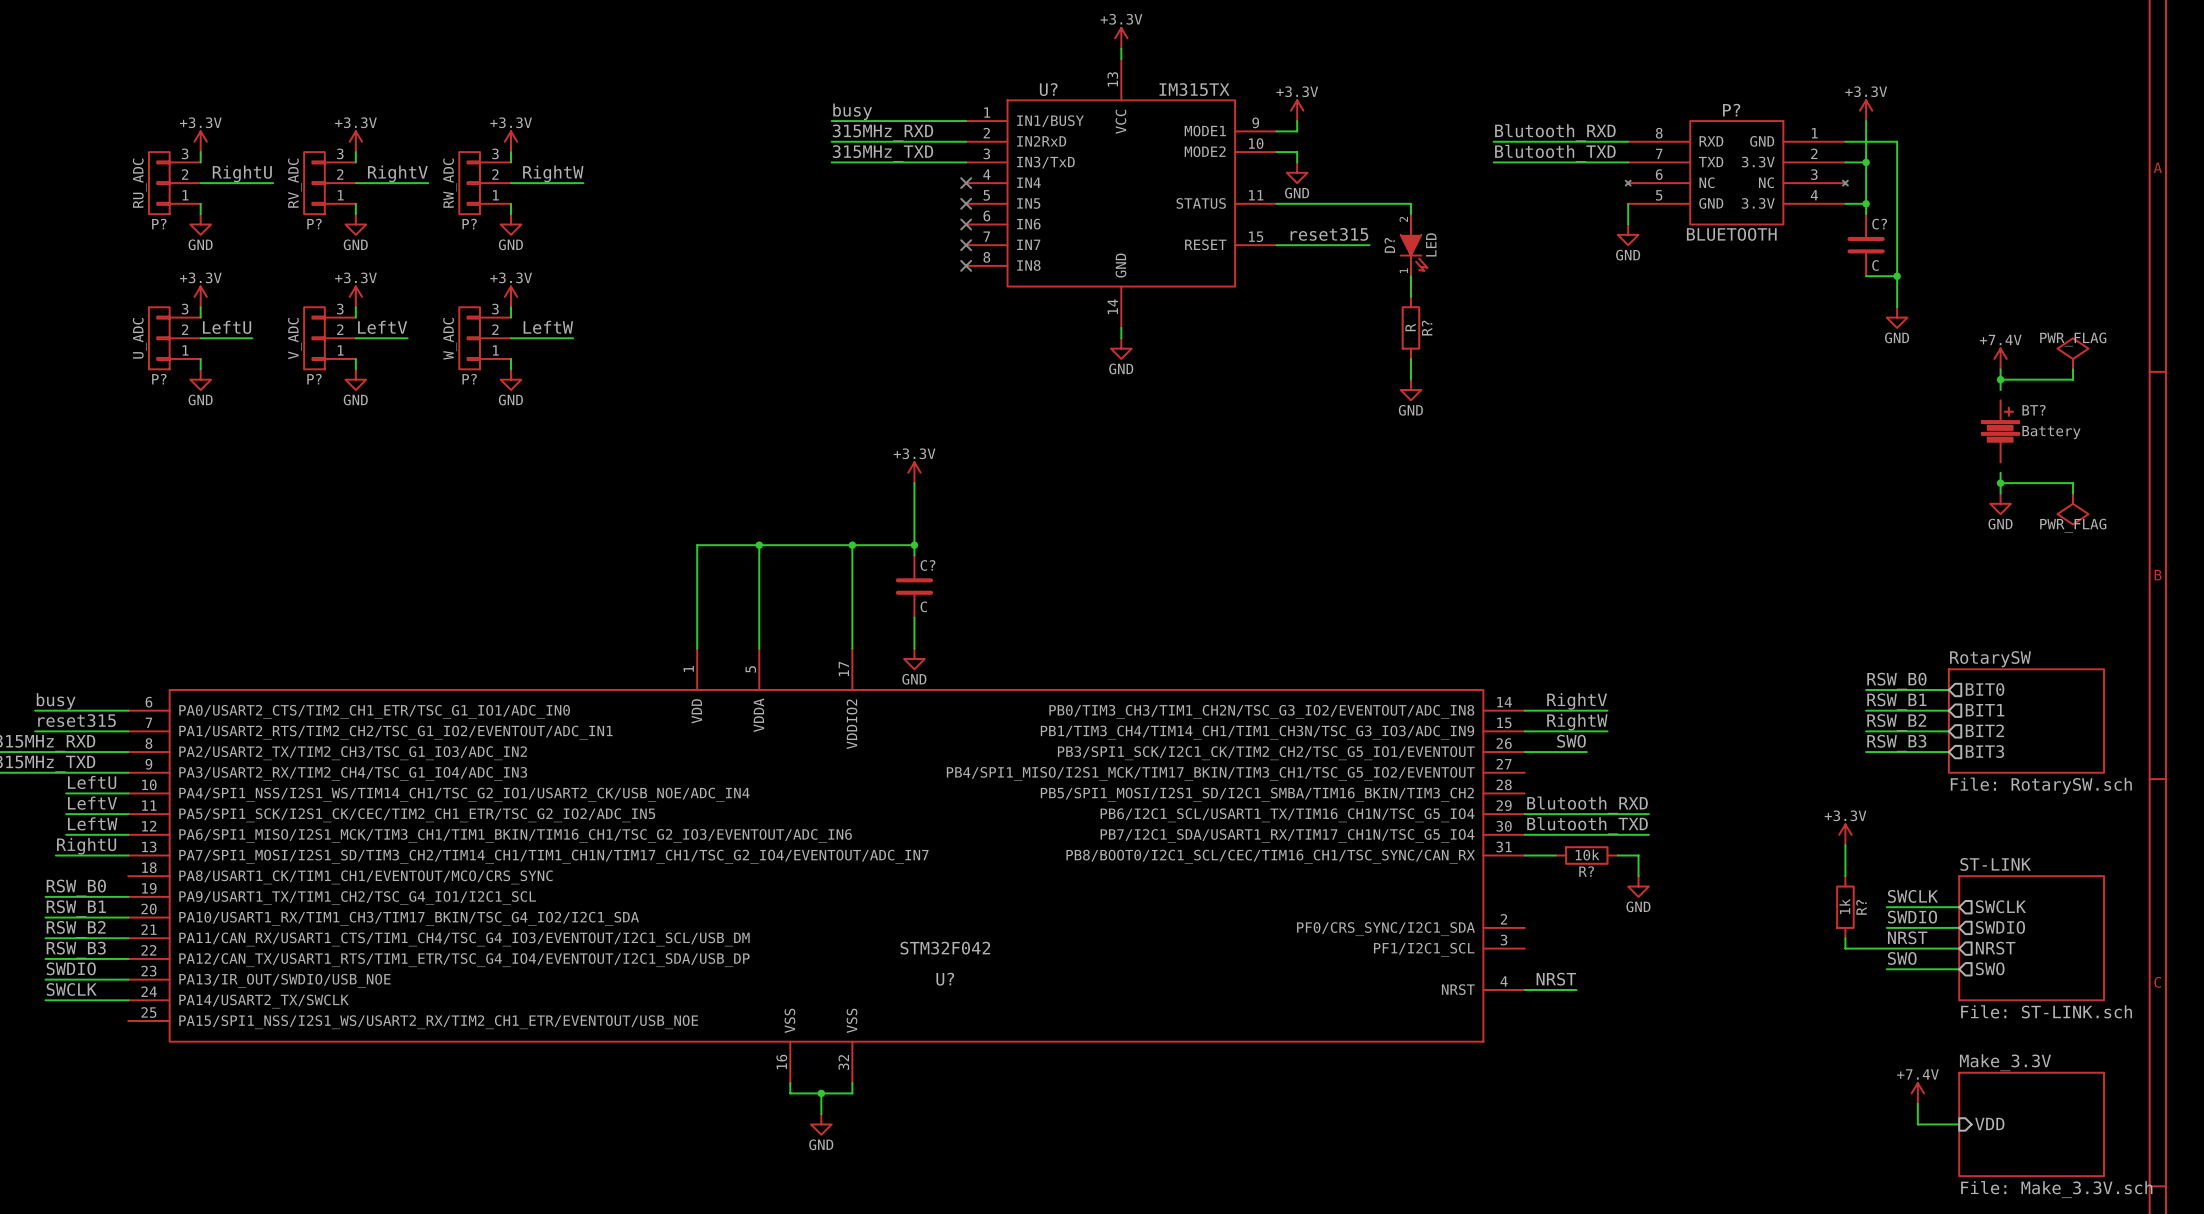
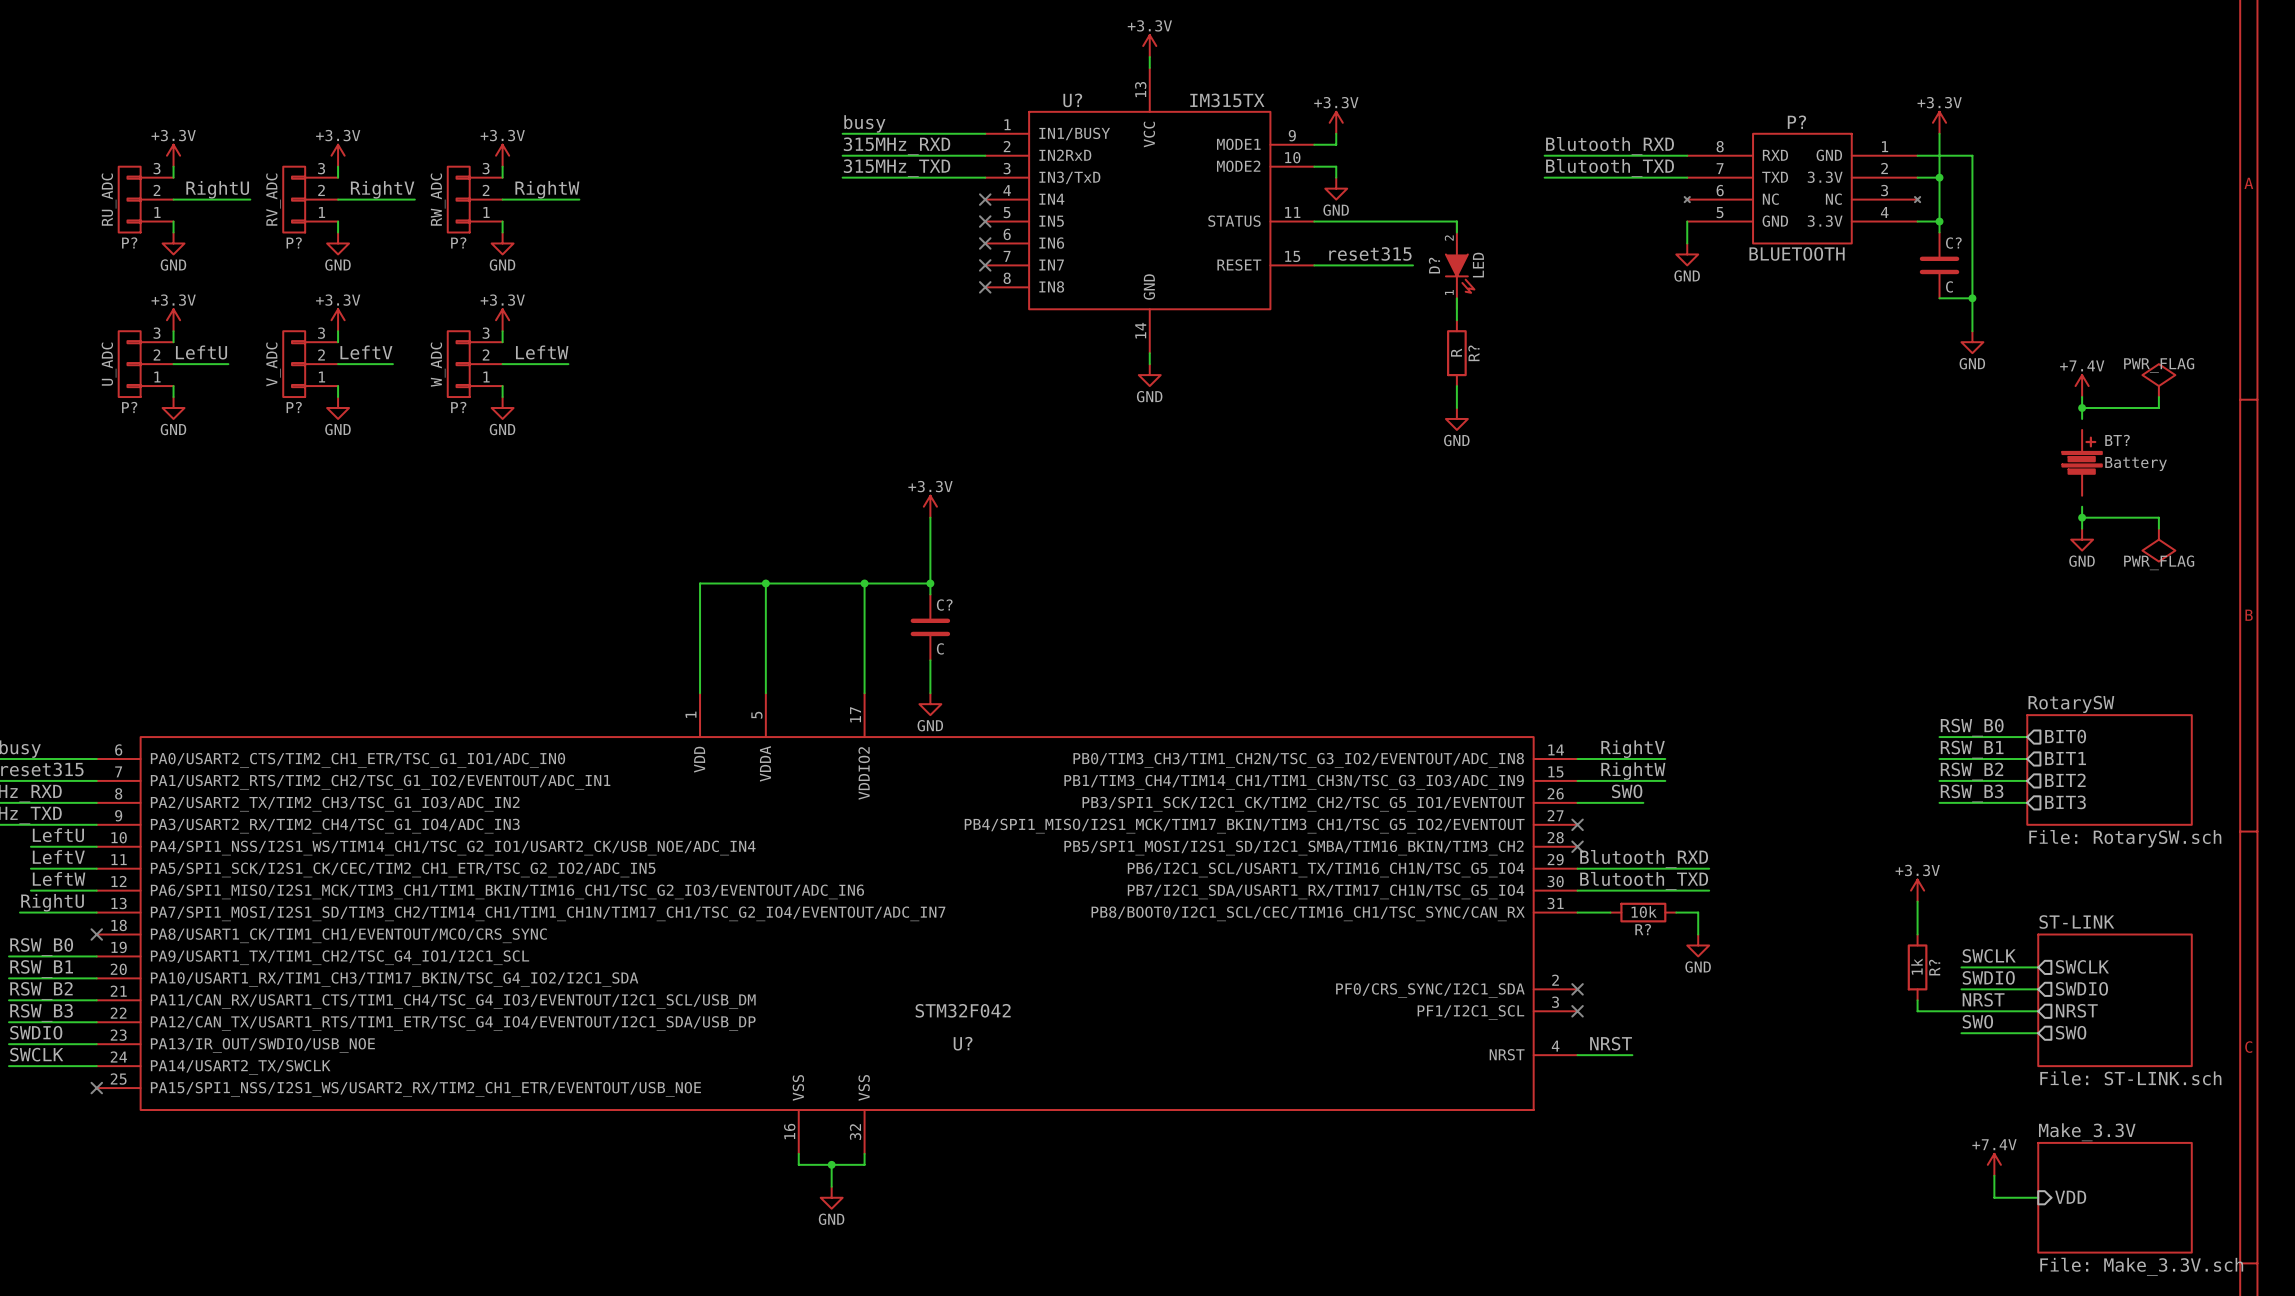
no-connect mark: none -> (1577, 824)
no-connect mark: none -> (1577, 846)
no-connect mark: none -> (96, 934)
no-connect mark: none -> (1577, 989)
no-connect mark: none -> (1577, 1011)
no-connect mark: none -> (96, 1088)

